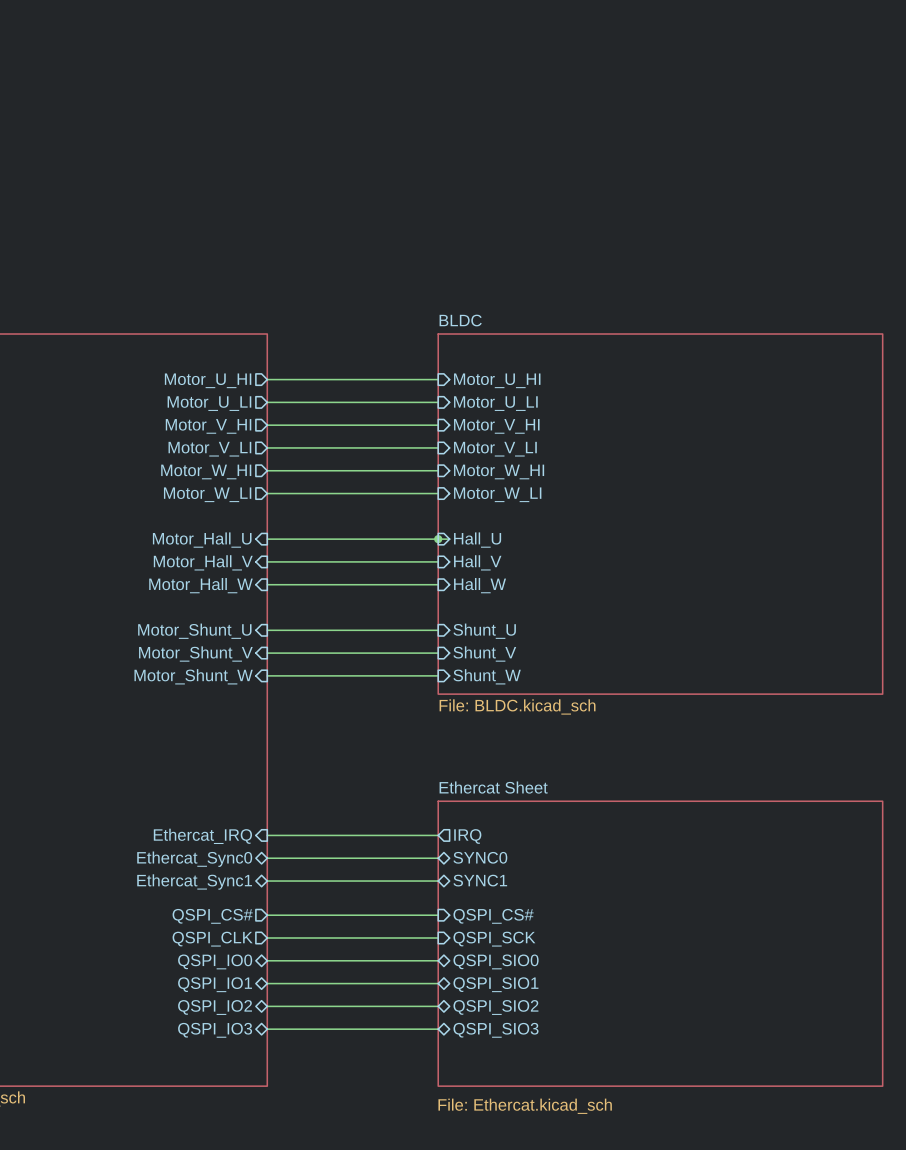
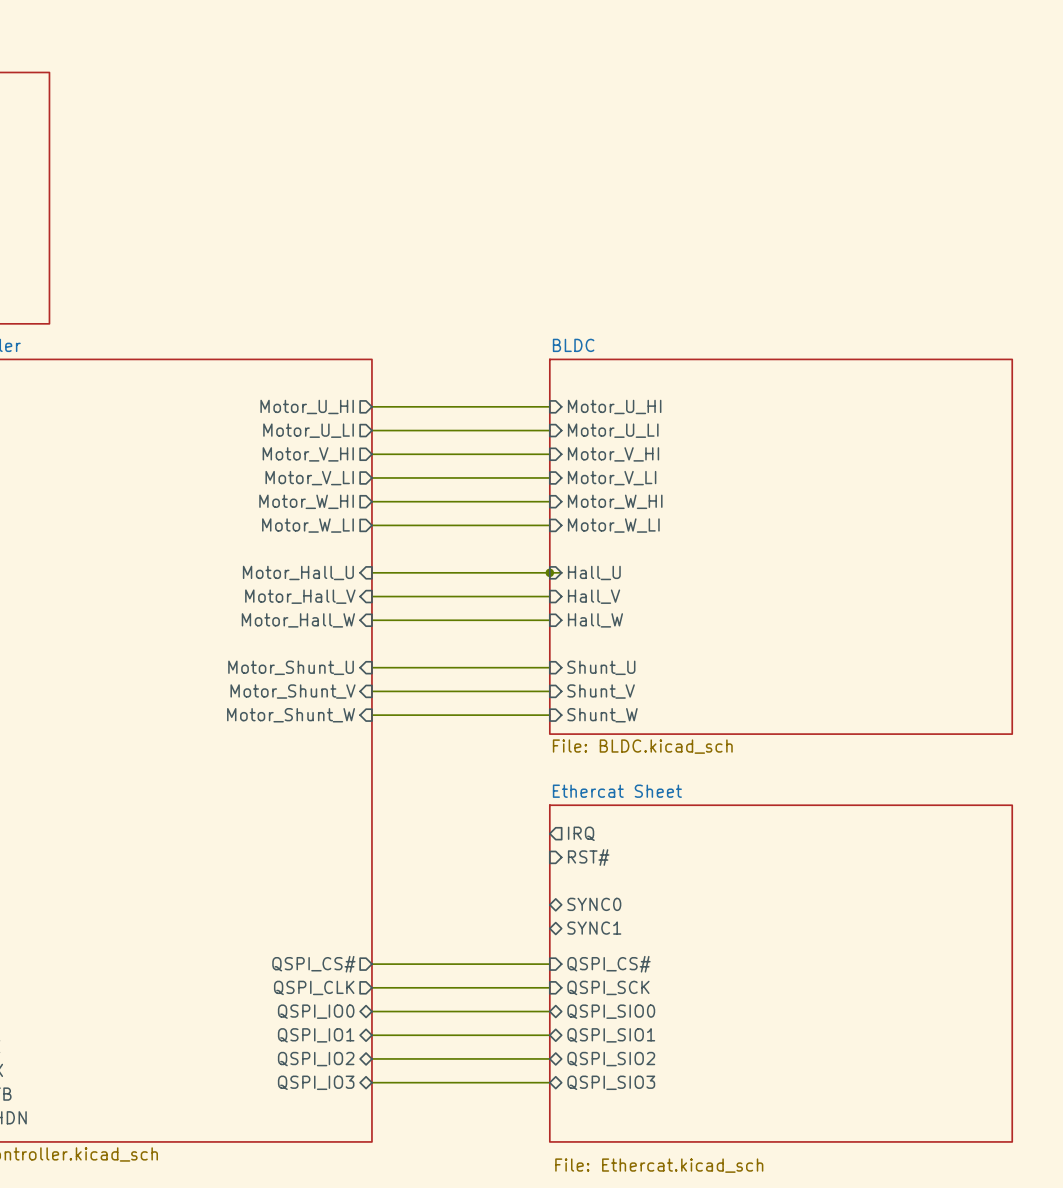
sheet pin: none -> RST# (588, 857)
wire: (267, 835) (438, 835) -> none
sheet pin: Ethercat_IRQ (202, 836) -> none
sheet pin position: IRQ (467, 836) -> IRQ (581, 833)
wire: (267, 858) (438, 858) -> none
sheet pin: Ethercat_Sync0 (194, 859) -> none
wire: (267, 881) (438, 881) -> none
sheet pin: Ethercat_Sync1 (194, 882) -> none
sheet Ethercat Sheet: none -> File: Ethercat.kicad_sch (781, 973)
sheet Ethercat Sheet: File: Ethercat.kicad_sch (660, 943) -> none

